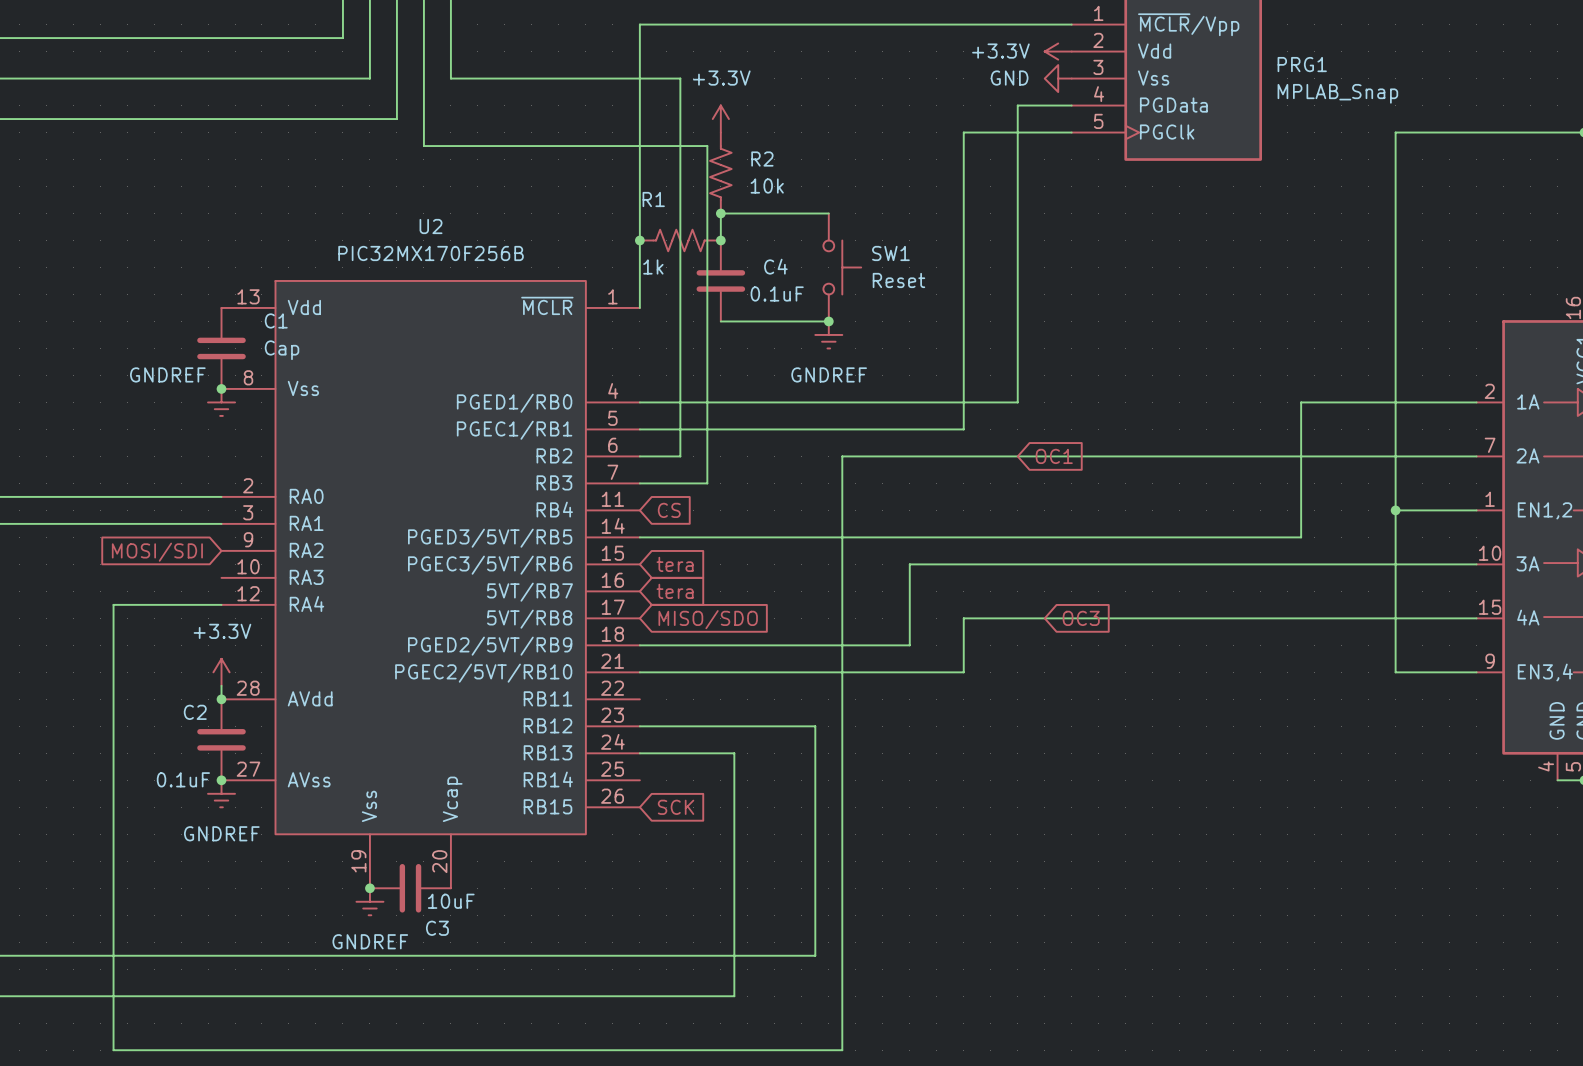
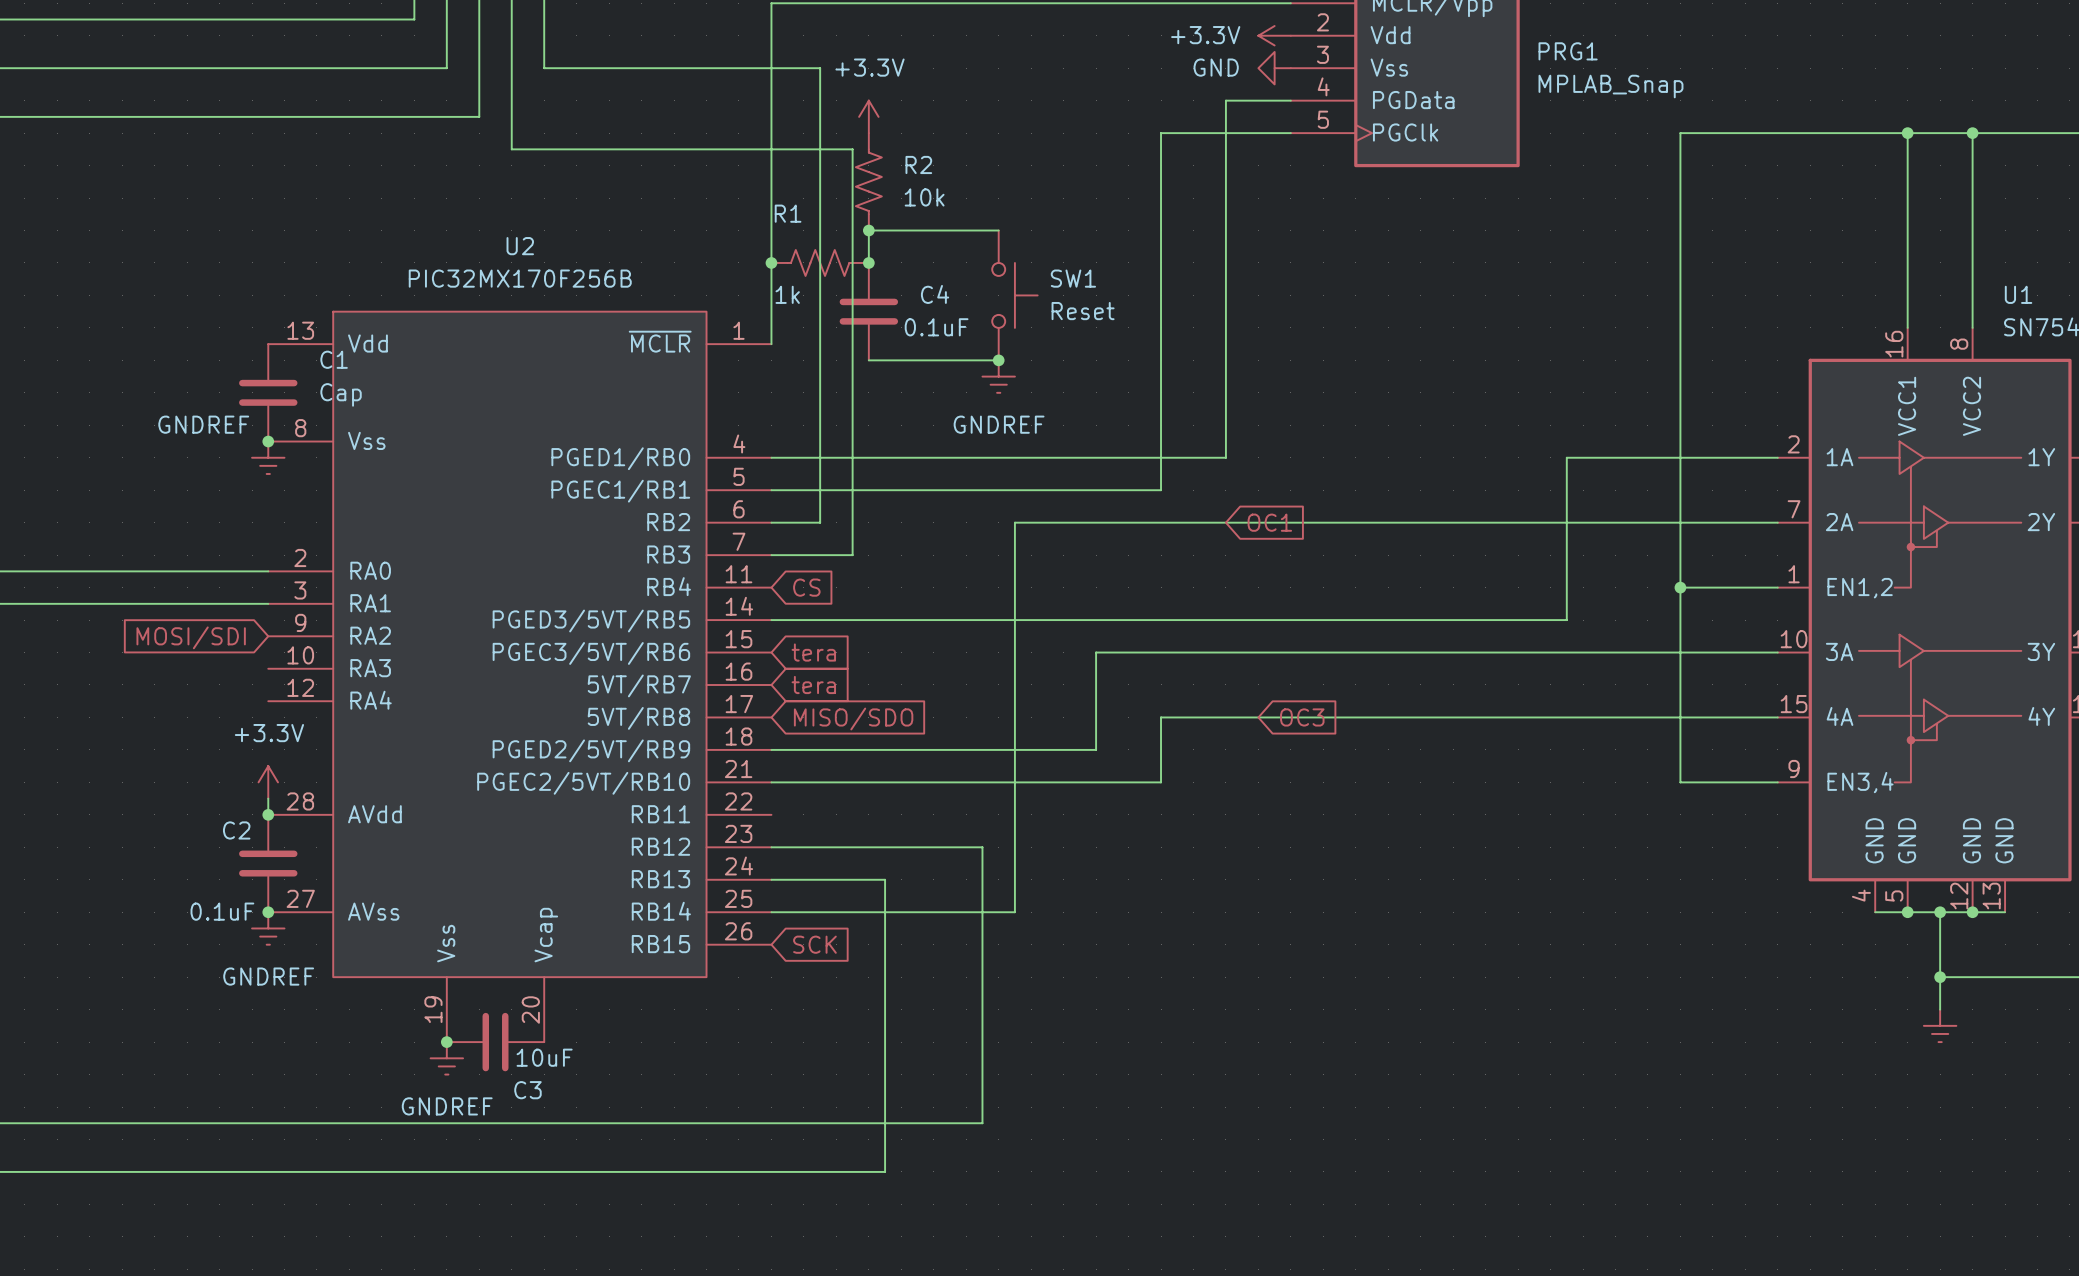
wire: (221, 604) (113, 604) (113, 1050) (842, 1050) (842, 780) -> (771, 912) (1014, 912)

